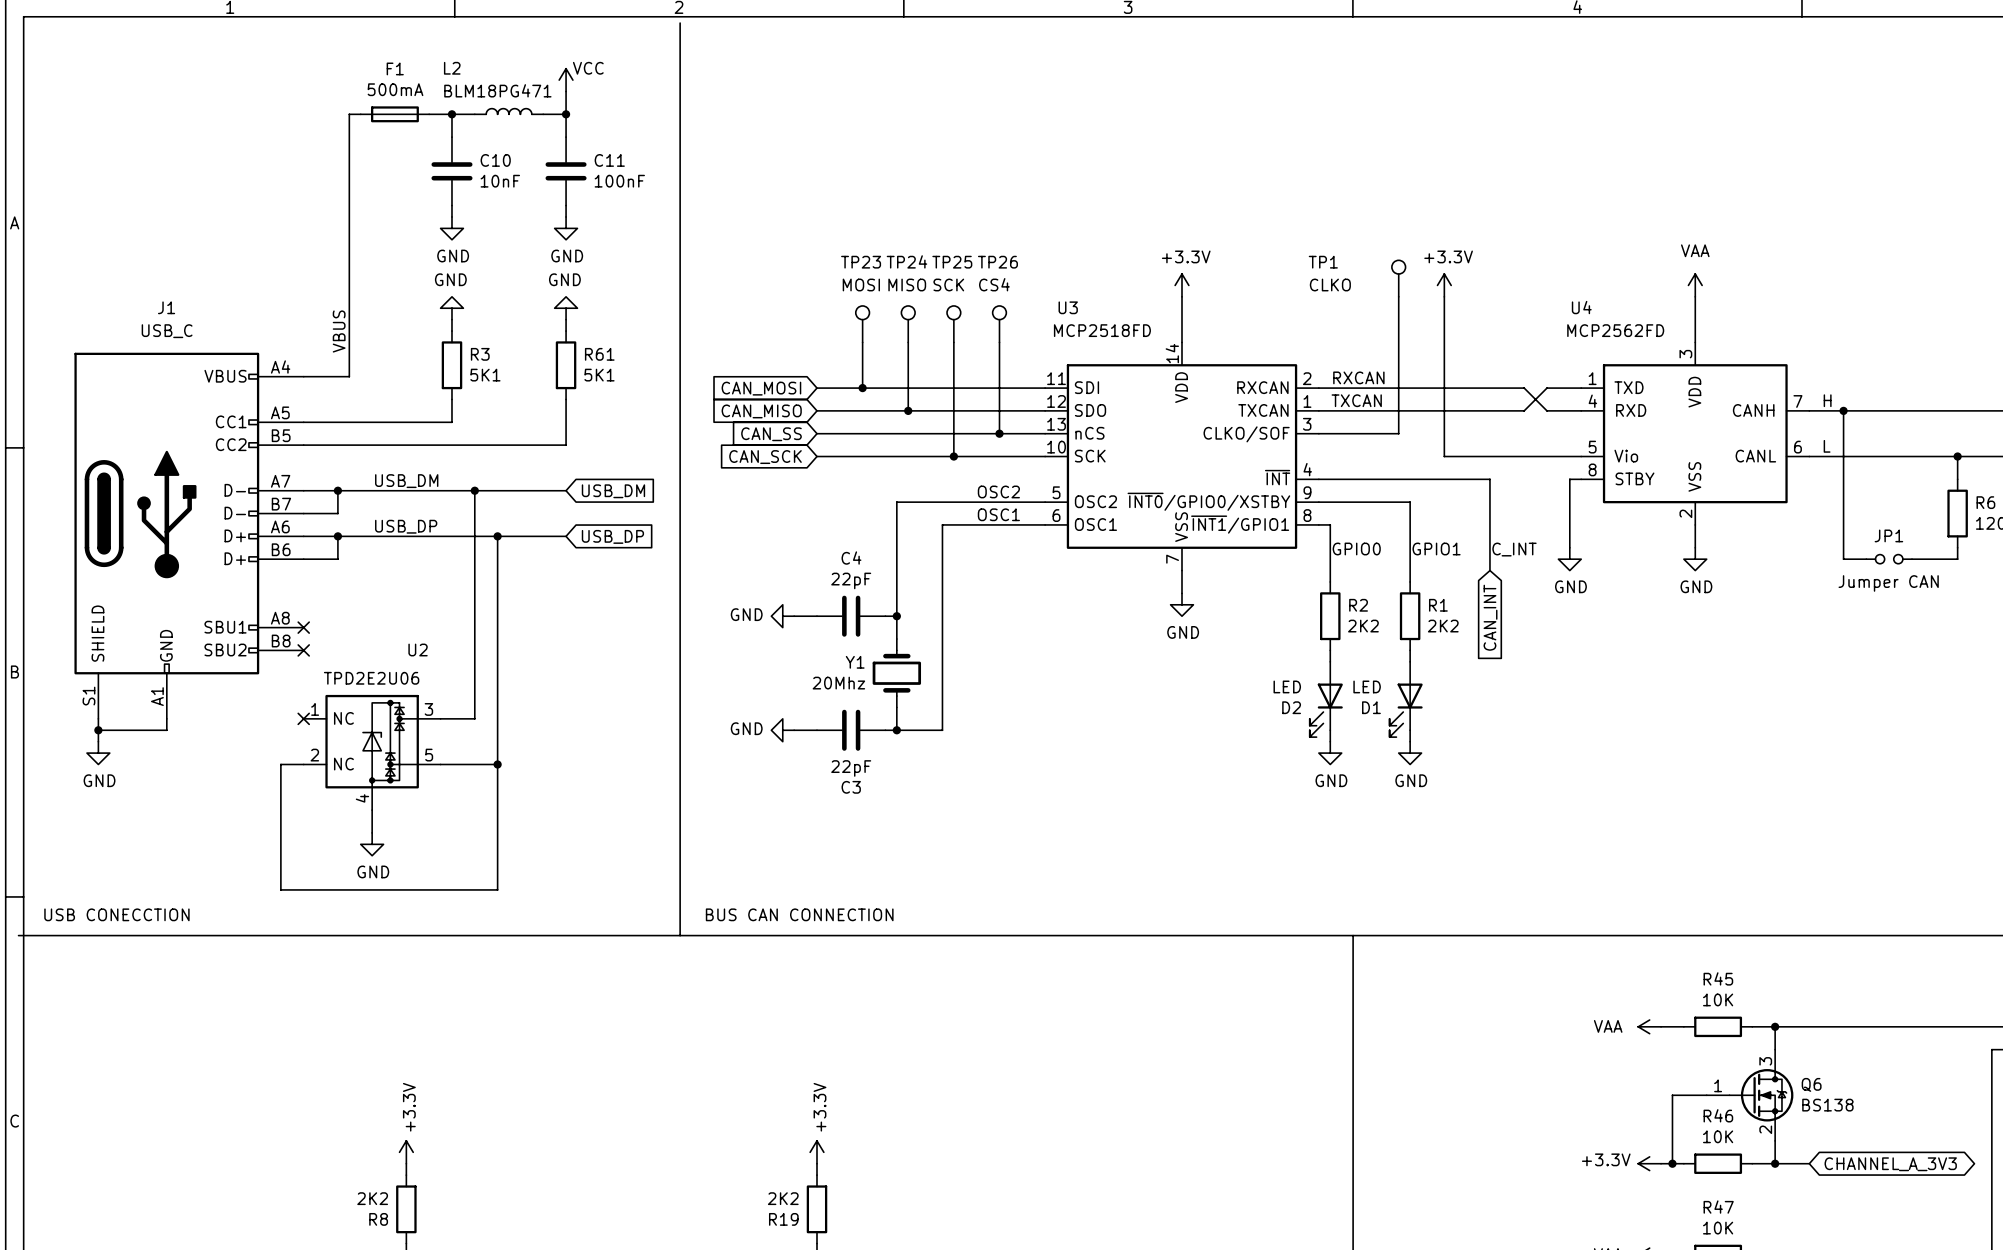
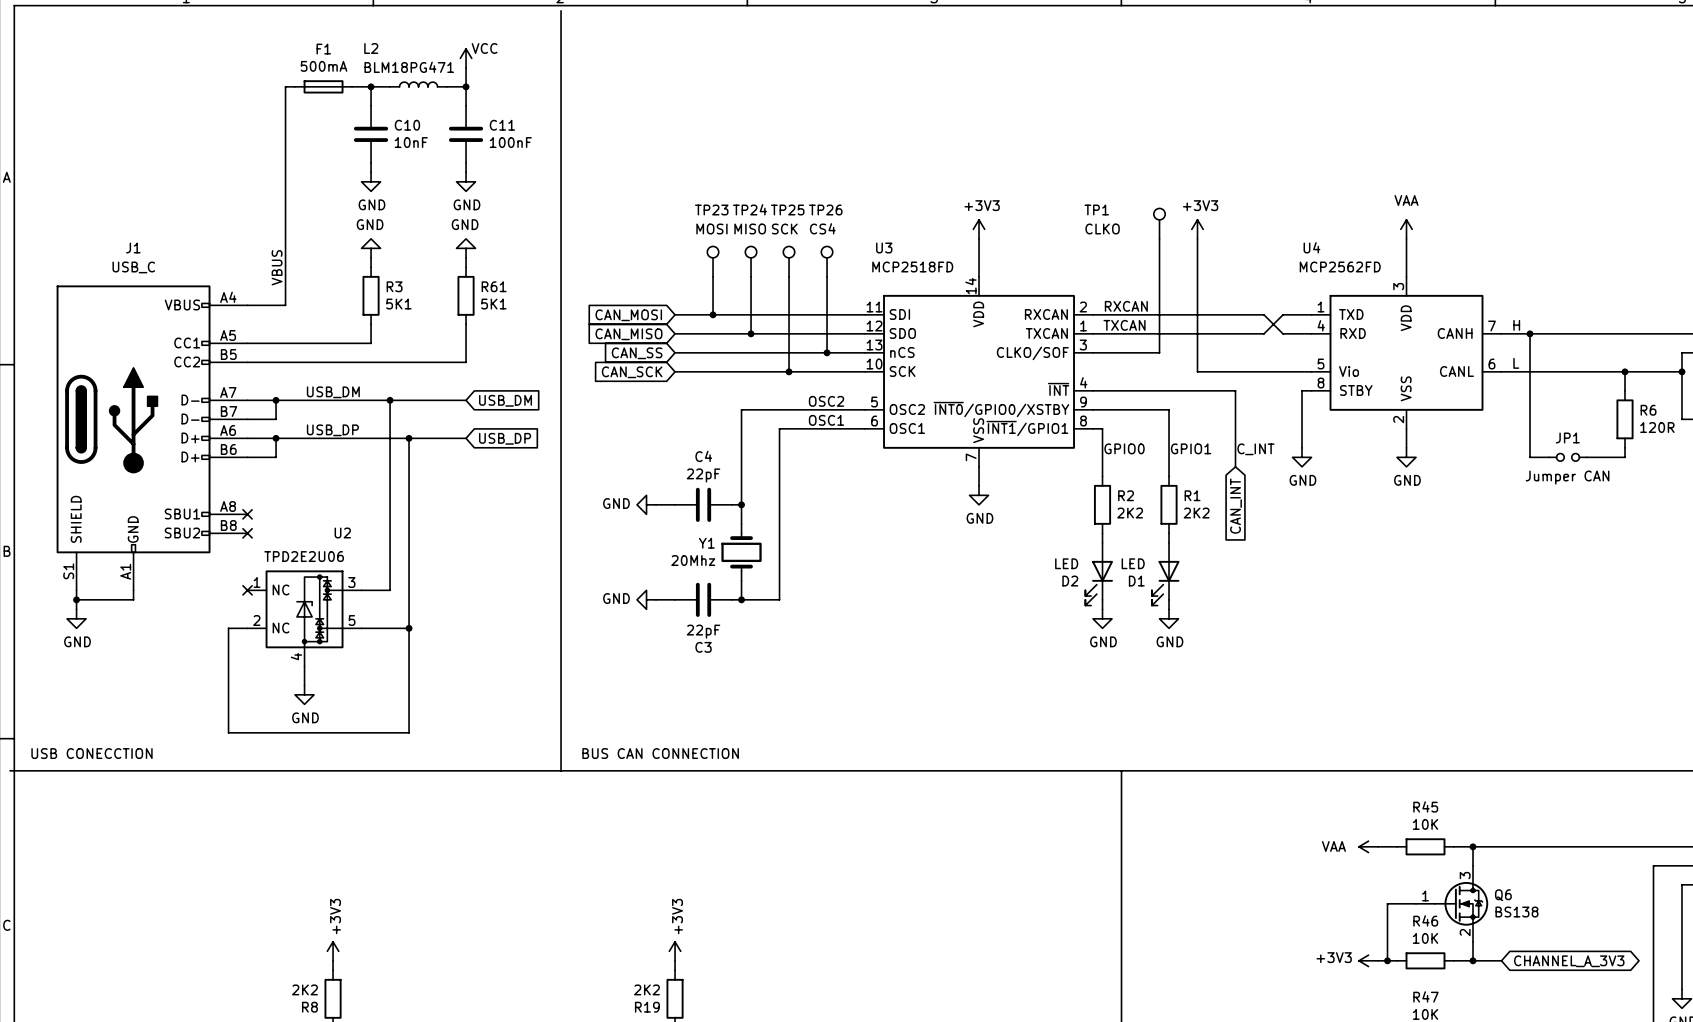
power symbol: +3.3V (1182, 285) -> +3V3 (979, 229)
power symbol: +3.3V (1444, 285) -> +3V3 (1197, 229)
power symbol: +3.3V (406, 1152) -> +3V3 (333, 951)
power symbol: +3.3V (816, 1152) -> +3V3 (675, 951)
power symbol: +3.3V (1649, 1163) -> +3V3 (1368, 960)

